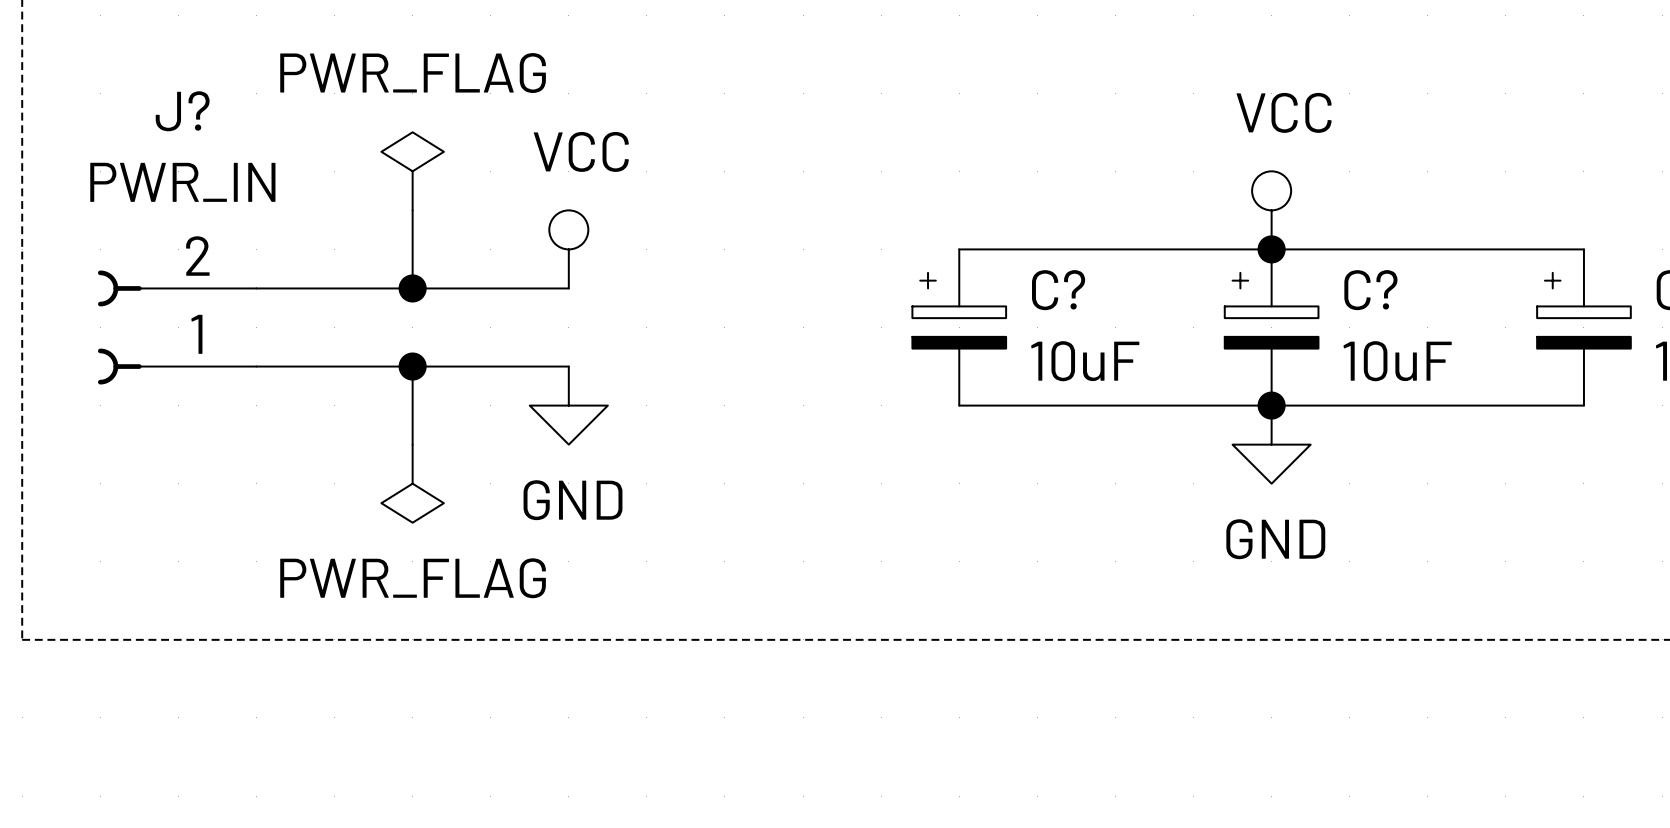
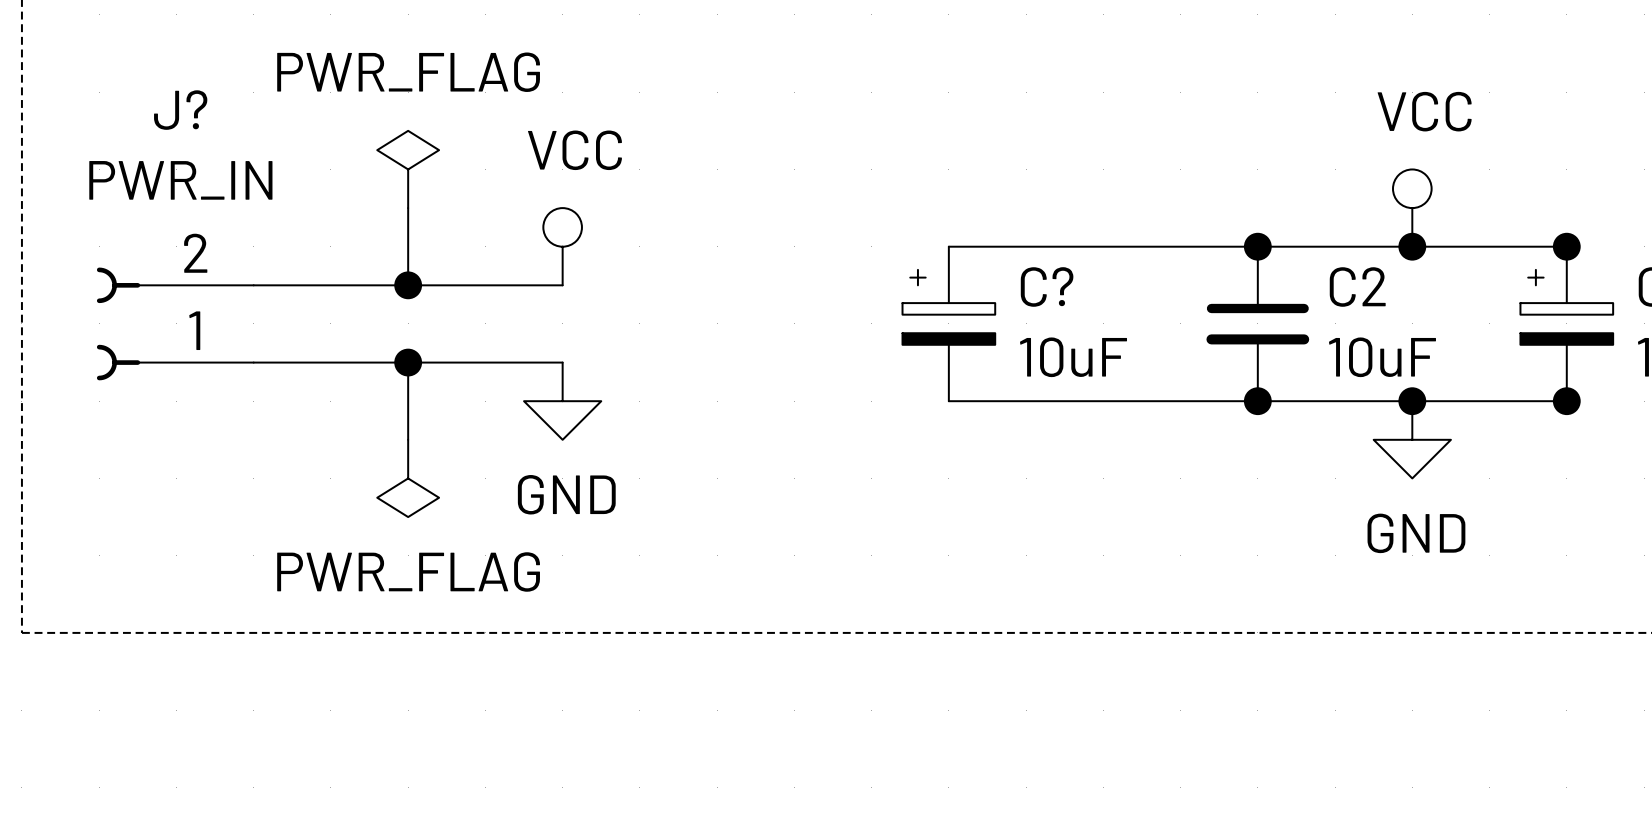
power symbol position: VCC (1271, 210) -> VCC (1412, 208)
junction: none -> (1412, 246)
junction: none -> (1566, 246)
C?: 10uF (1271, 327) -> none
C2: none -> 10uF (1257, 323)
junction: none -> (1412, 401)
junction: none -> (1566, 401)
power symbol position: GND (1271, 444) -> GND (1412, 439)

